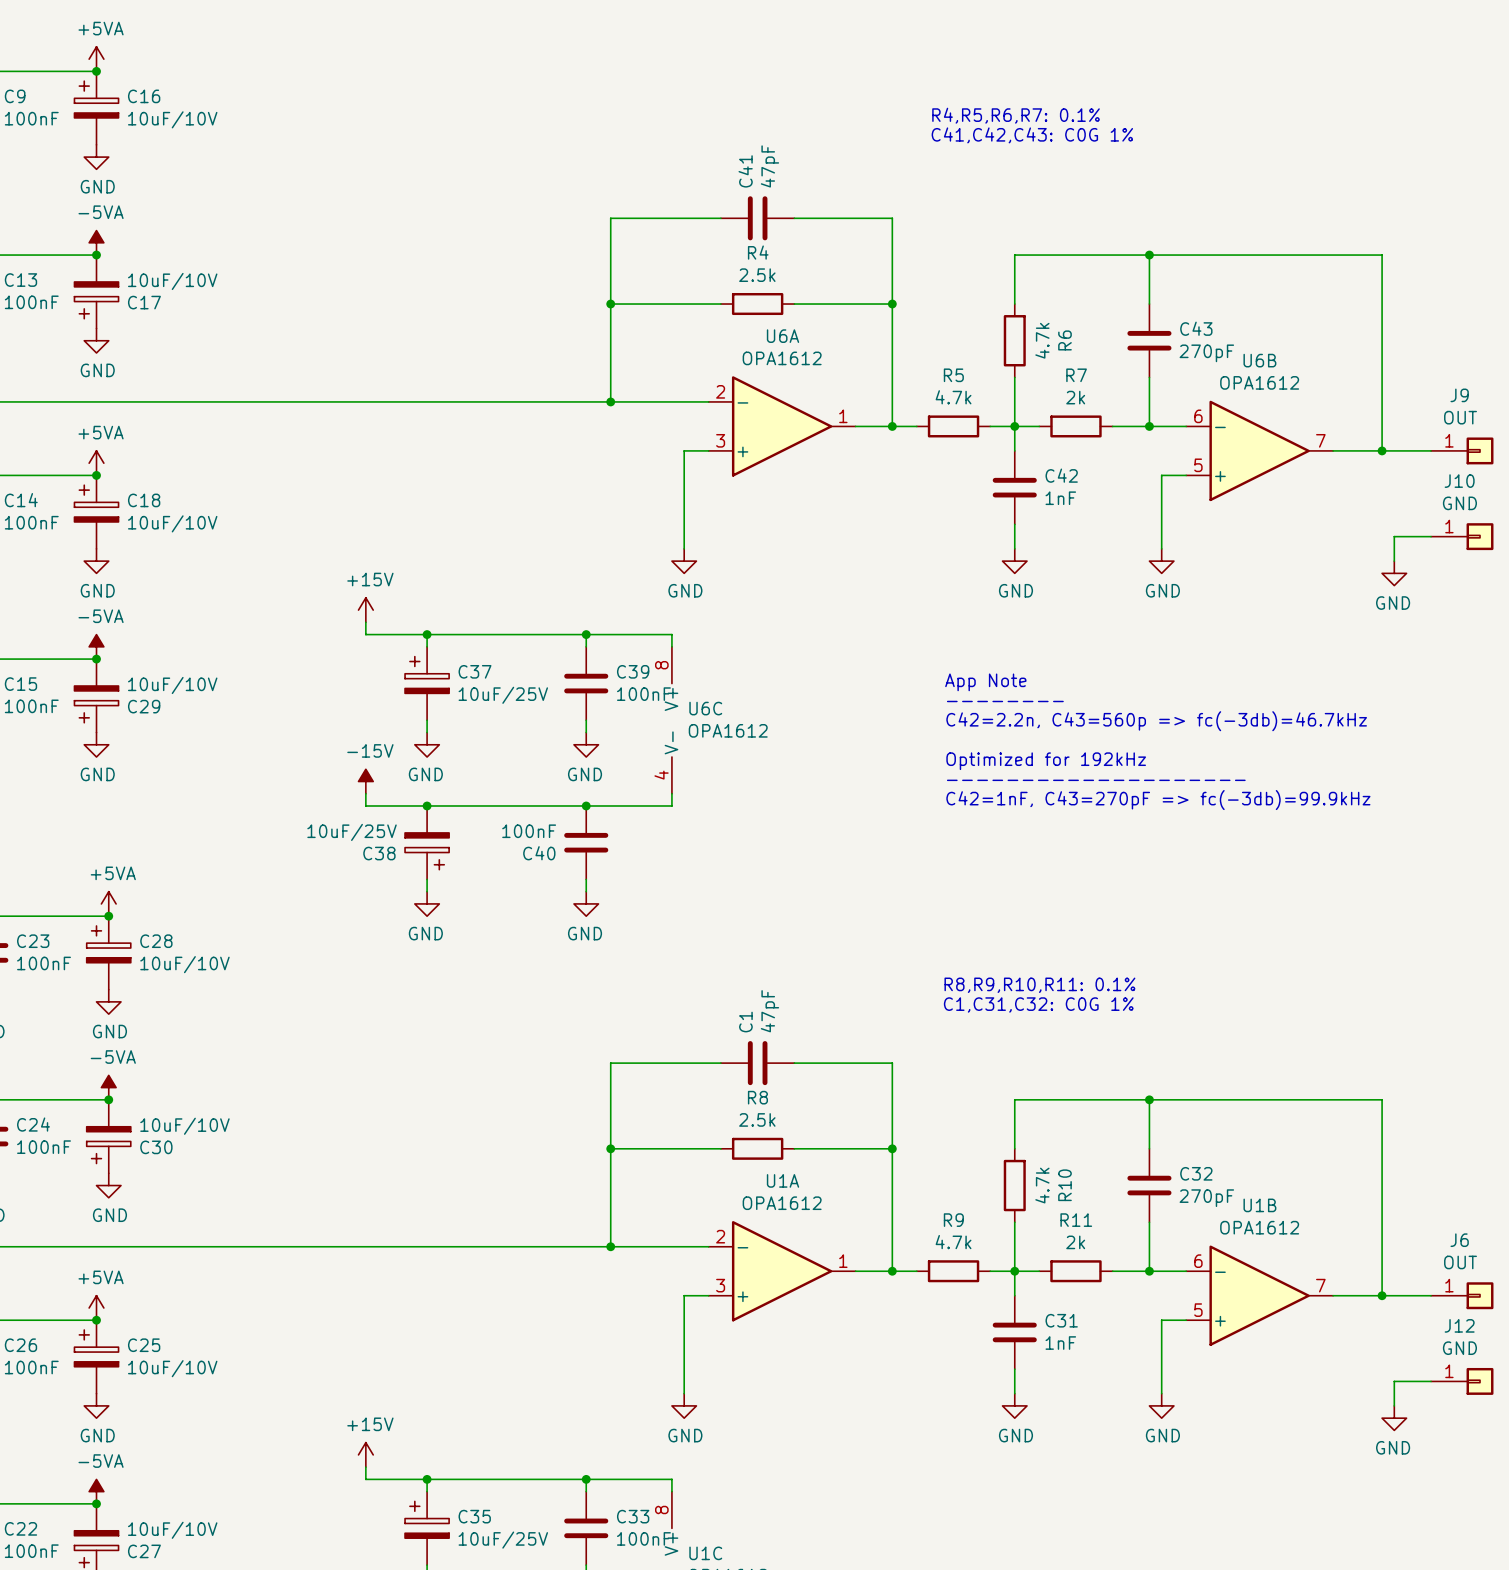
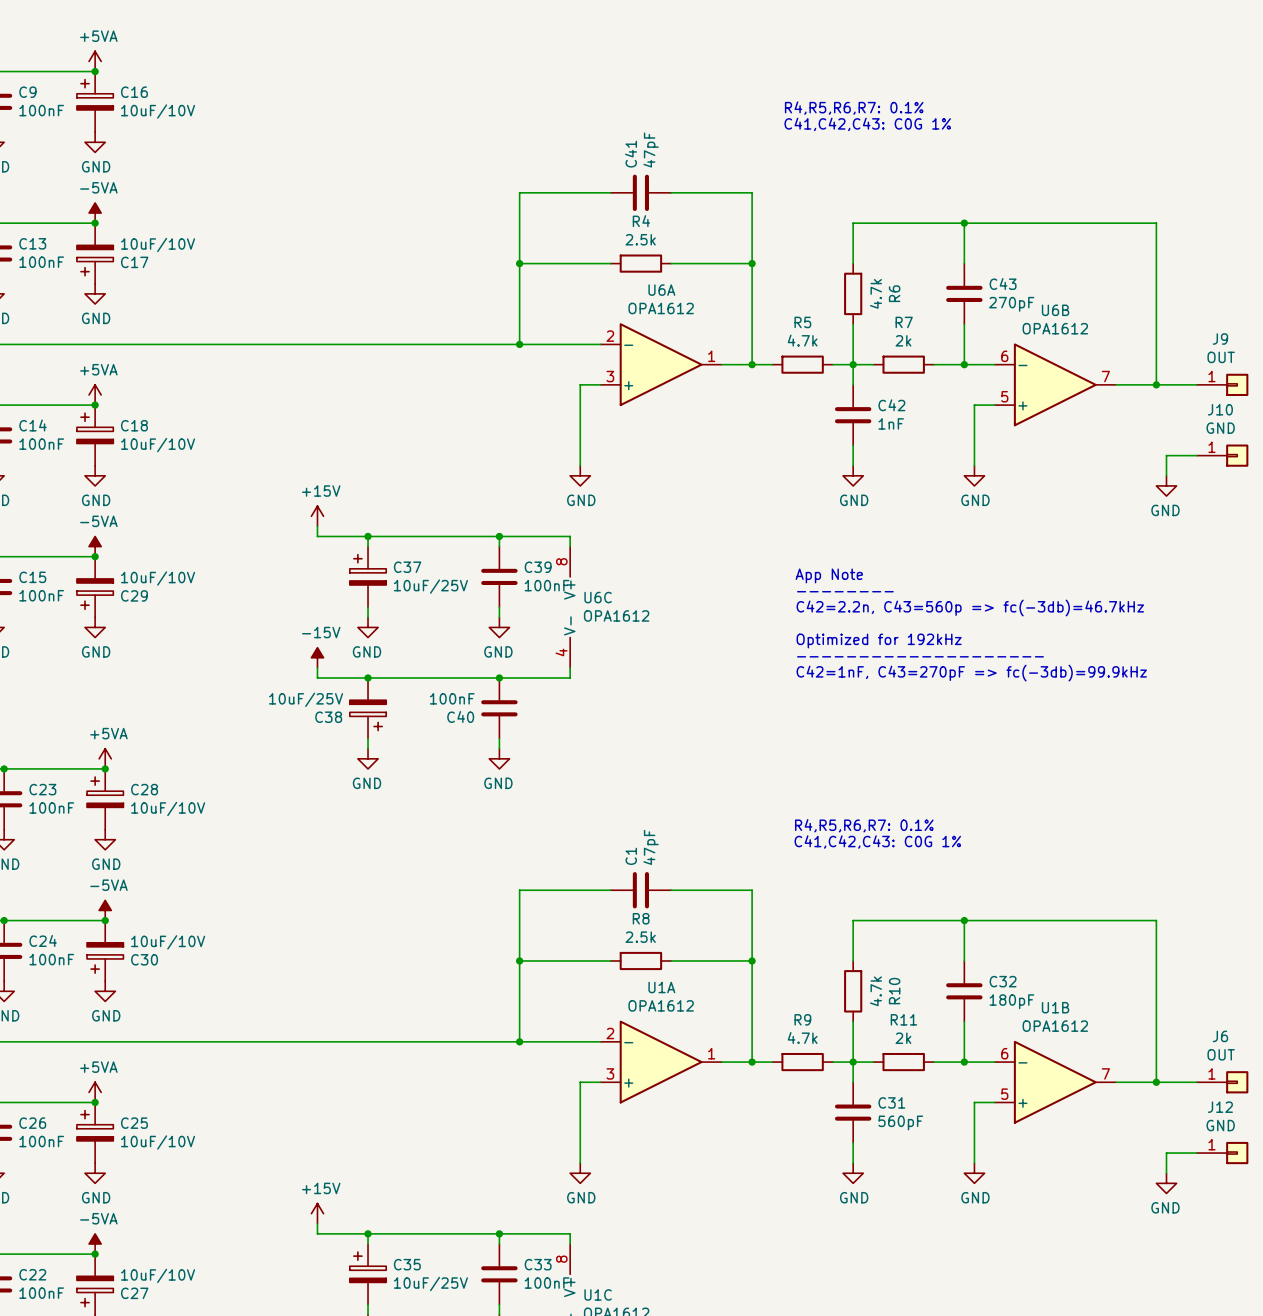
text: R8,R9,R10,R11: 0.1% (1039, 985) -> R4,R5,R6,R7: 0.1% (864, 825)
text: C1,C31,C32: C0G 1% (1038, 1004) -> C41,C42,C43: C0G 1% (877, 842)
C32 value: 270pF (1206, 1198) -> 180pF (1011, 1001)
C31 value: 1nF (1060, 1343) -> 560pF (900, 1123)

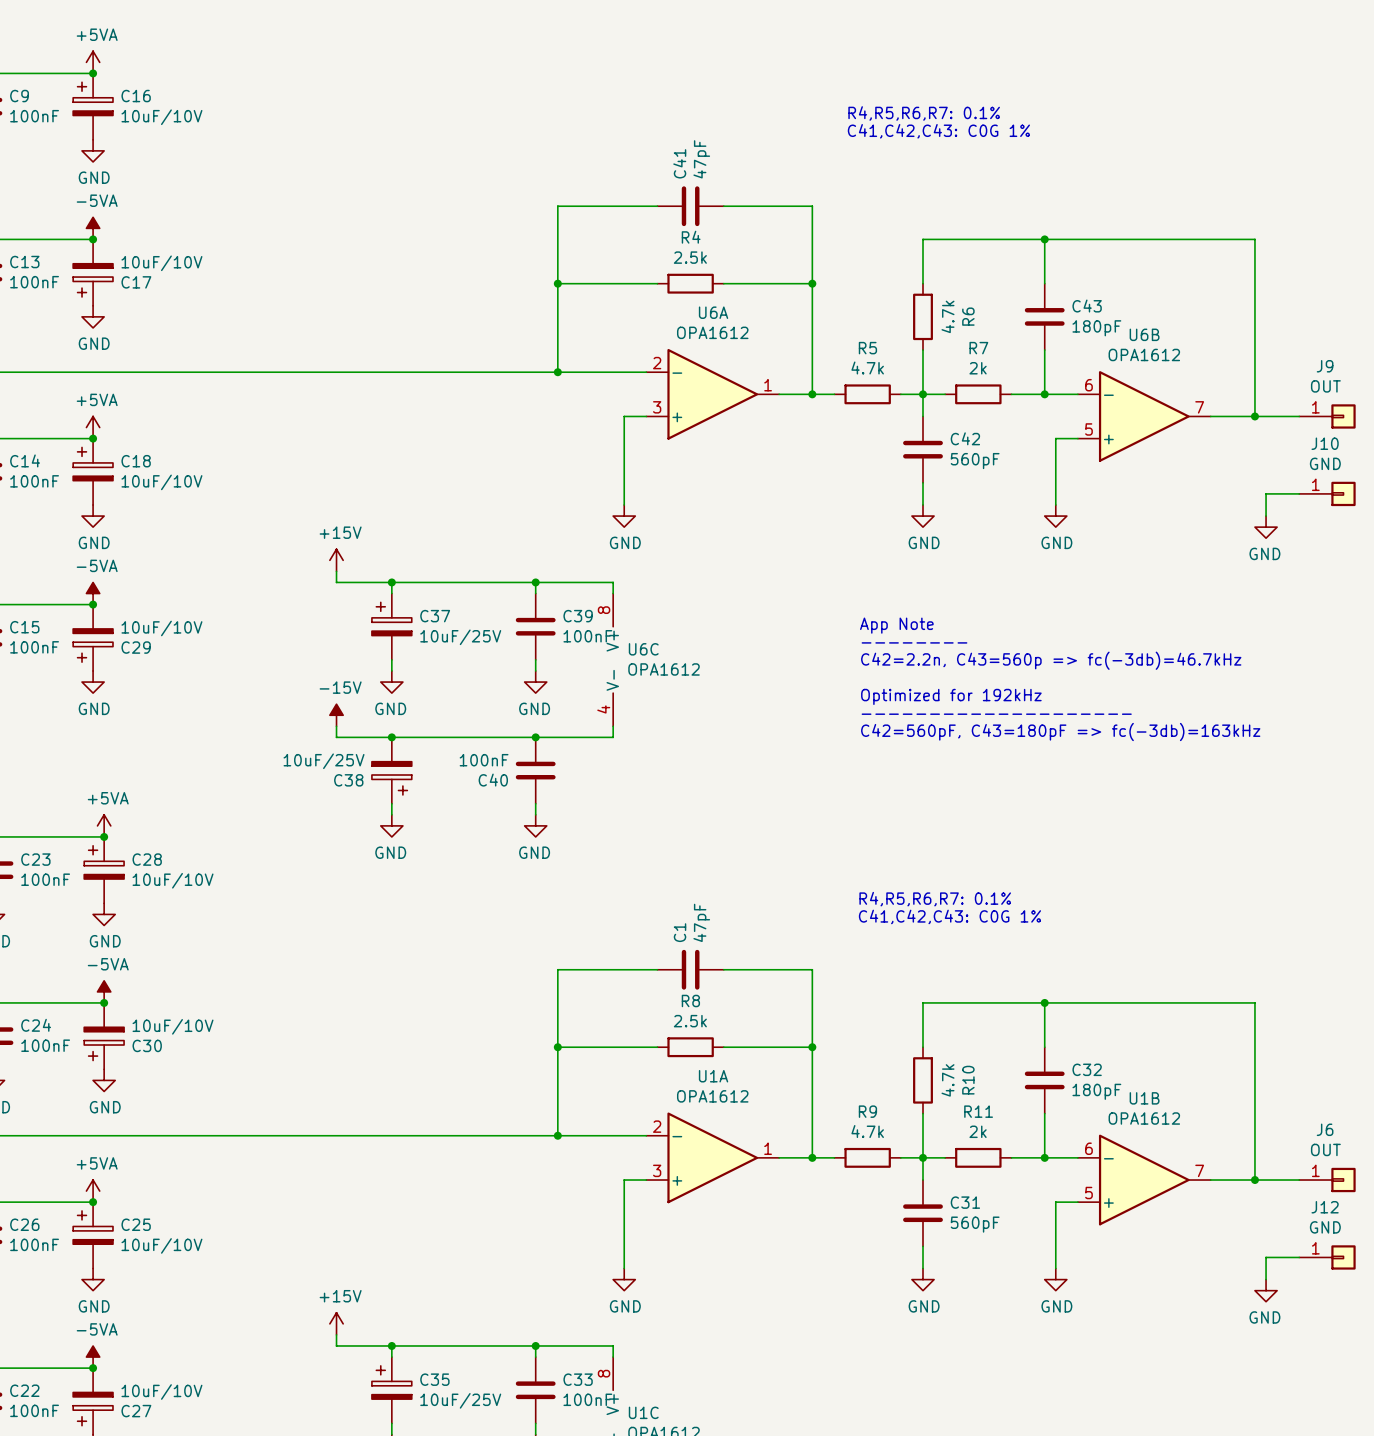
C43 value: 270pF (1011, 304) -> 180pF (1096, 328)
C42 value: 1nF (891, 423) -> 560pF (975, 461)
text: C42=1nF, C43=270pF => fc(-3db)=99.9kHz (971, 673) -> C42=560pF, C43=180pF => fc(-3db)=163kHz (1060, 732)

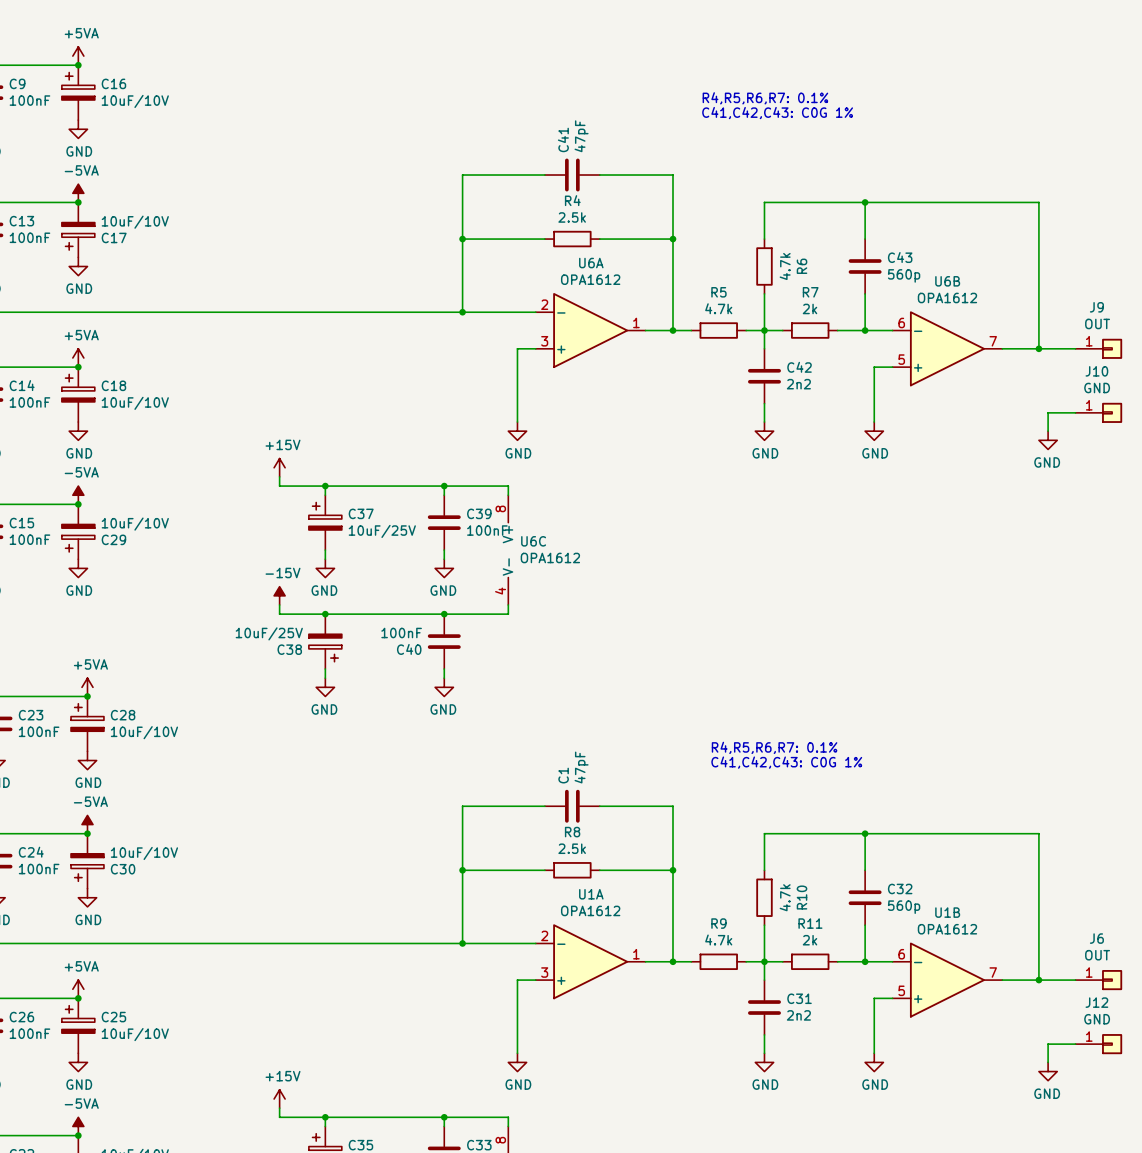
C43 value: 180pF (1096, 328) -> 560p (904, 275)
C42 value: 560pF (975, 461) -> 2n2 (798, 384)
text: App Note (896, 625) -> none
text: -------- (914, 642) -> none
text: C42=2.2n, C43=560p => fc(-3db)=46.7kHz (1051, 660) -> none
text: Optimized for 192kHz (951, 696) -> none
text: -------------------- (996, 714) -> none
text: C42=560pF, C43=180pF => fc(-3db)=163kHz (1060, 732) -> none
C32 value: 180pF (1096, 1091) -> 560p (904, 907)
C31 value: 560pF (975, 1224) -> 2n2 (798, 1015)

